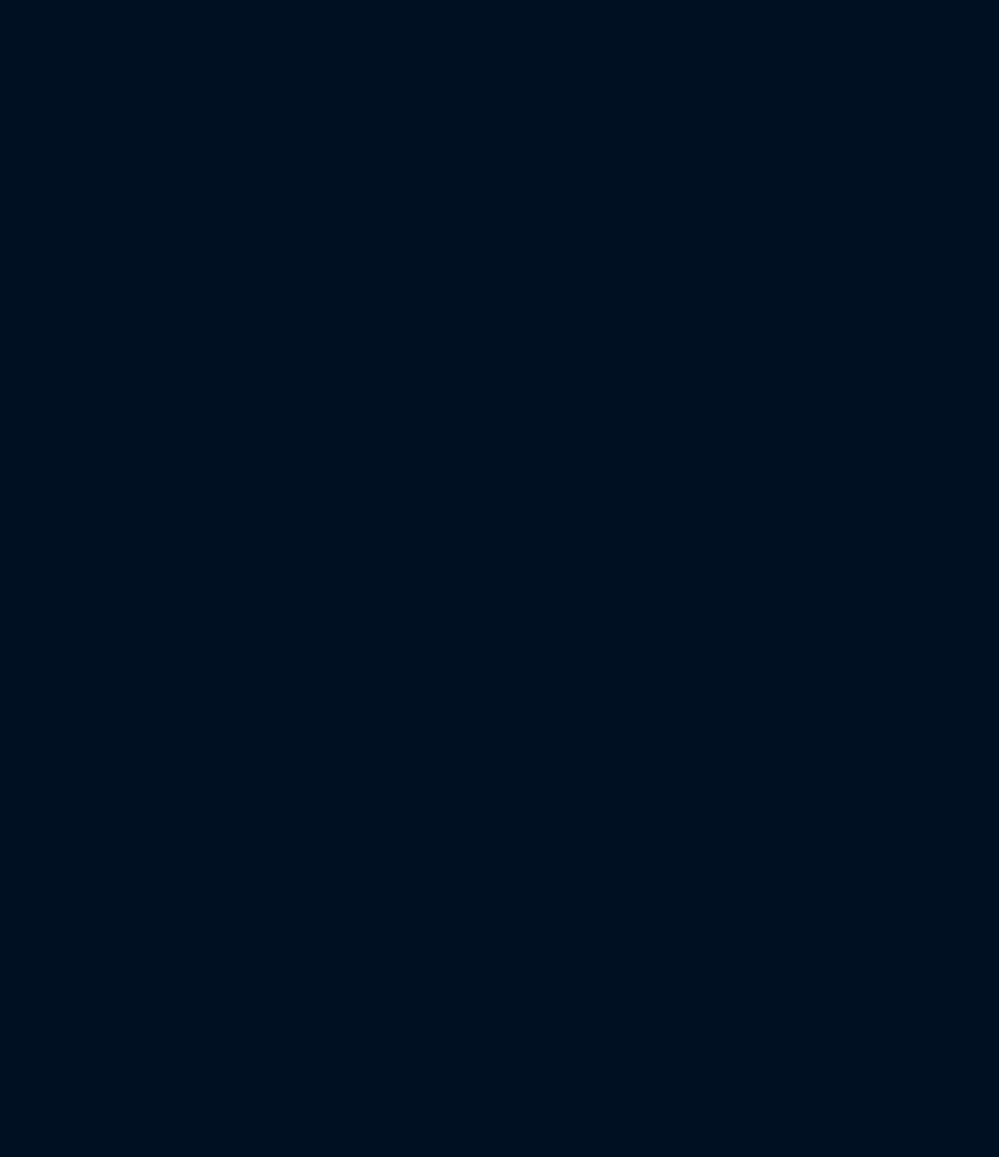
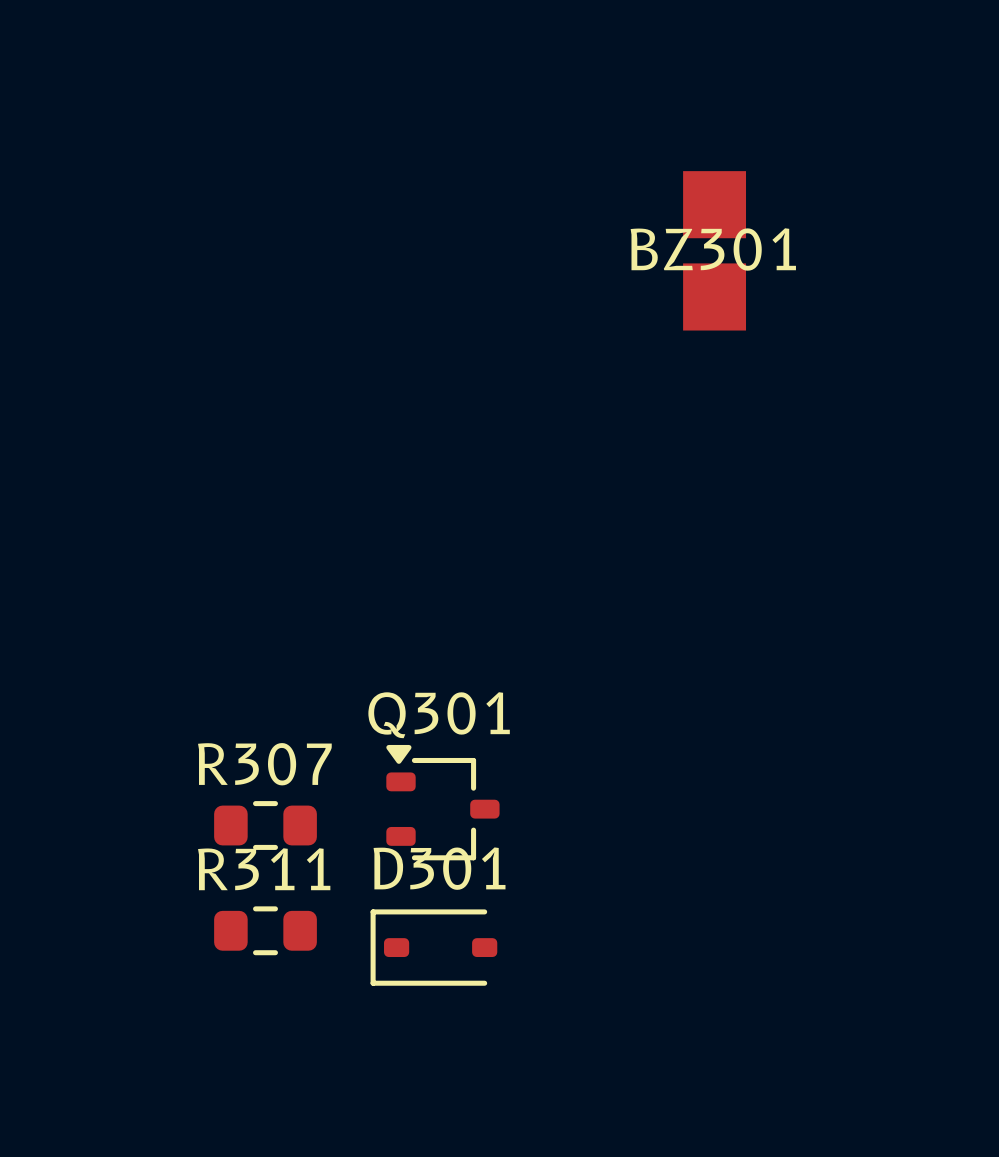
BZ301: none -> (714, 250)
Q301: none -> (442, 802)
R307: none -> (265, 825)
R311: none -> (265, 930)
D301: none -> (433, 947)

